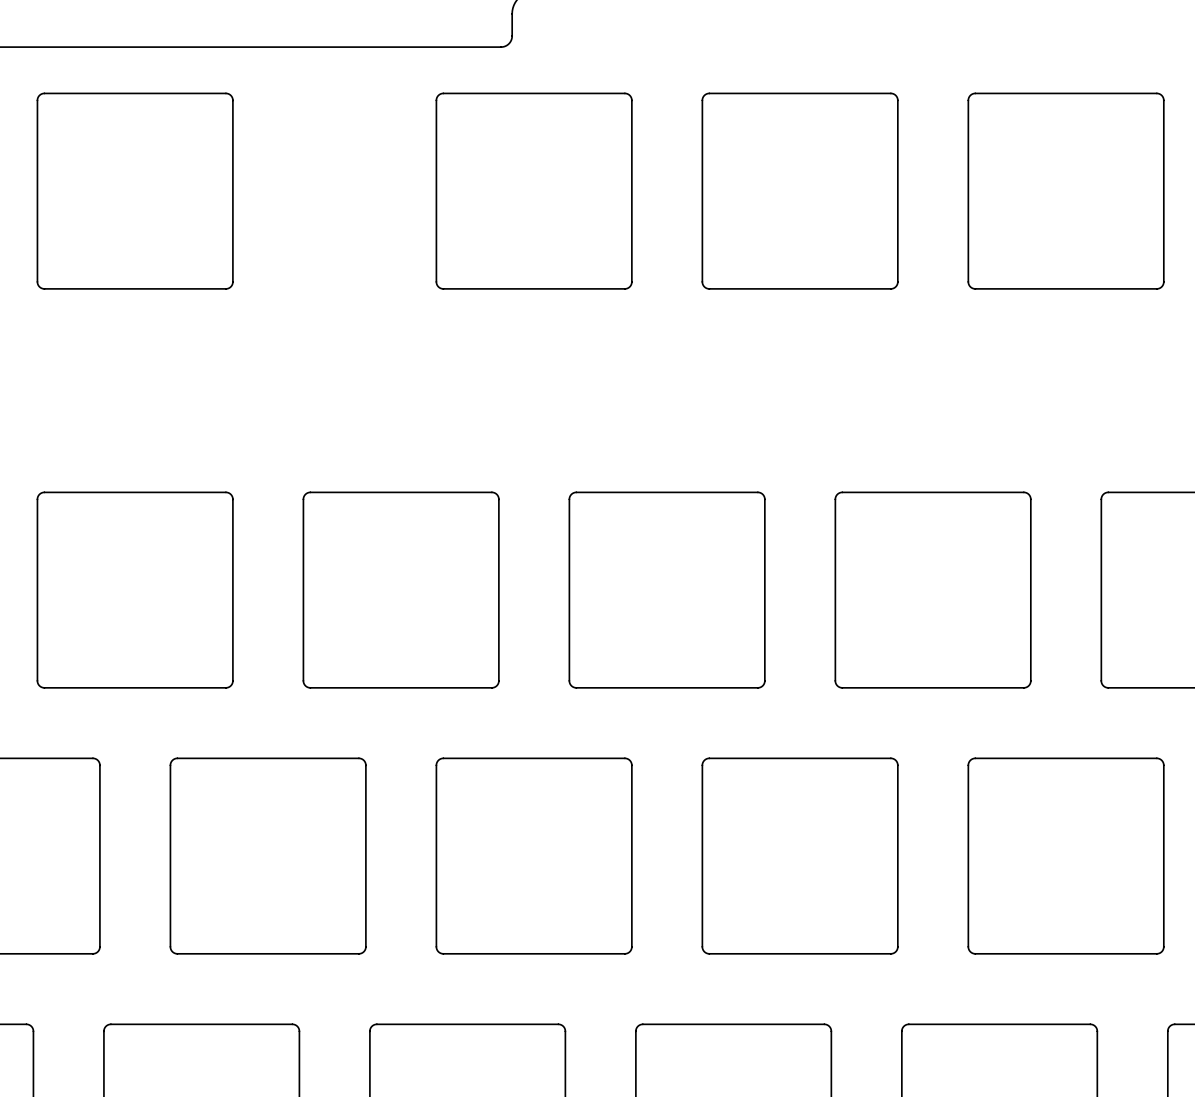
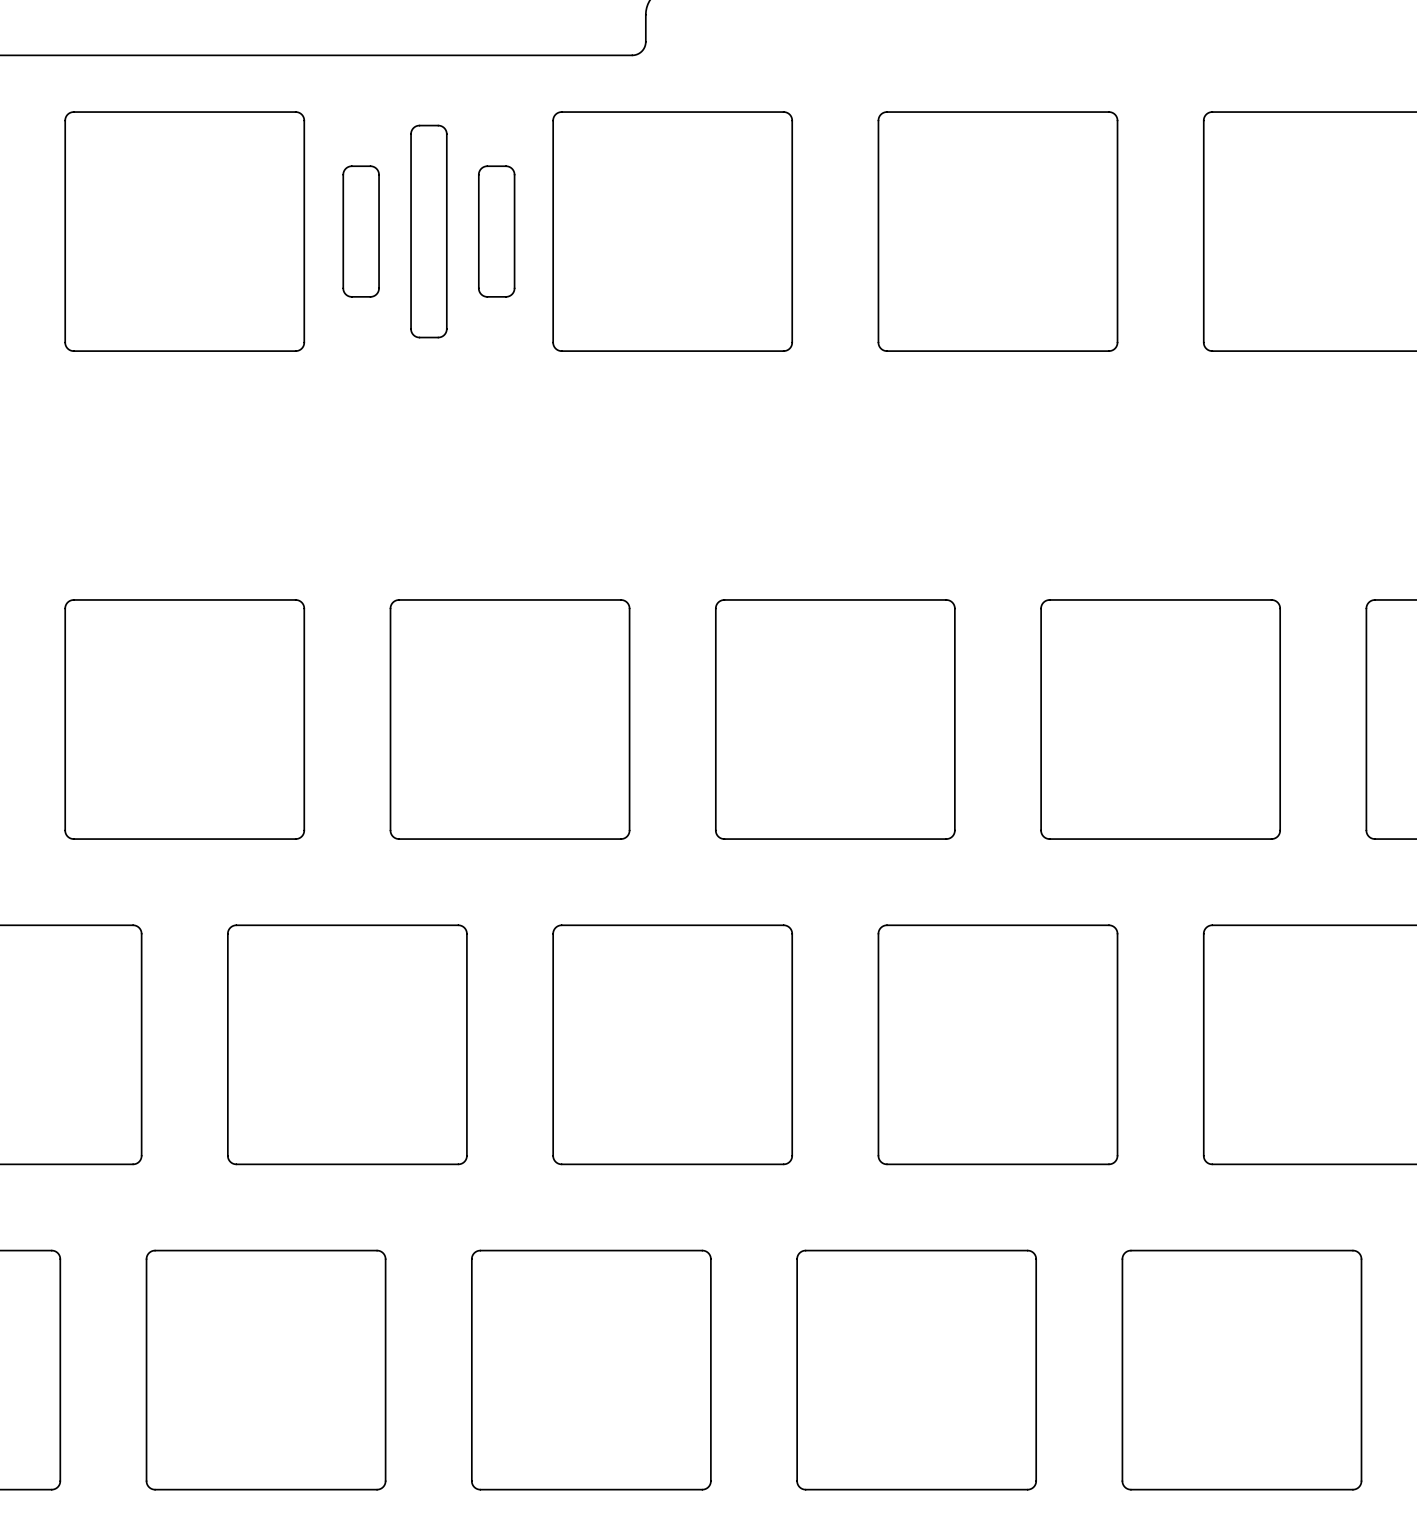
board edge: none -> (438, 125) (417, 125) (411, 132) (411, 328) (413, 335) (418, 337) (440, 337) (446, 330) (446, 134) (444, 128) (438, 125)
board edge: none -> (370, 166) (349, 166) (343, 173) (343, 288) (345, 294) (350, 296) (372, 296) (378, 289) (378, 173) (376, 168) (370, 166)
board edge: none -> (506, 166) (485, 166) (478, 173) (478, 288) (481, 294) (486, 296) (508, 296) (514, 289) (514, 173) (512, 168) (506, 166)

